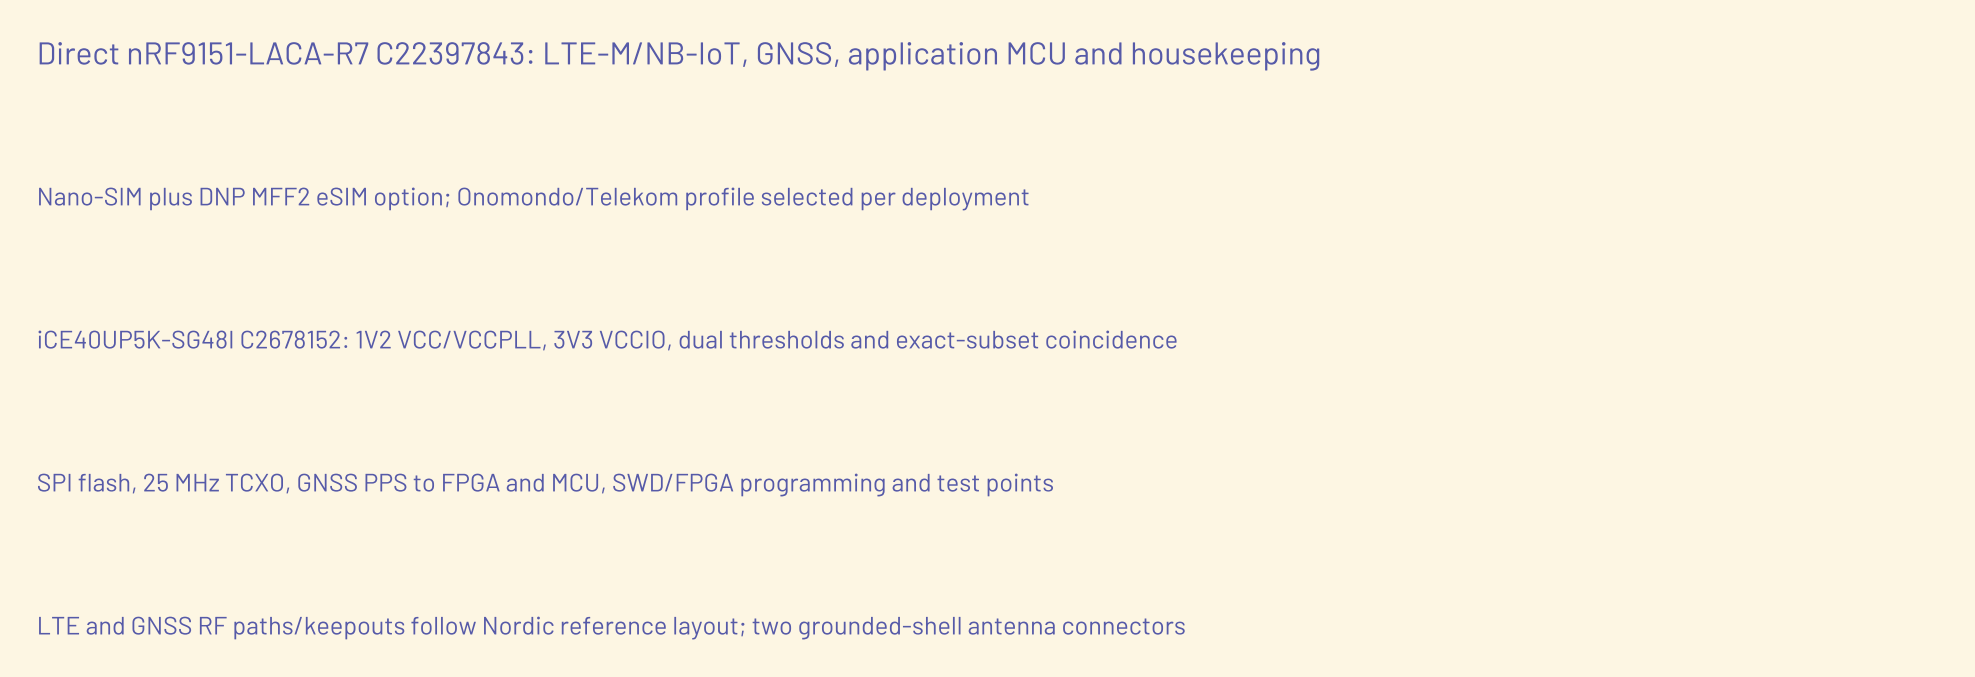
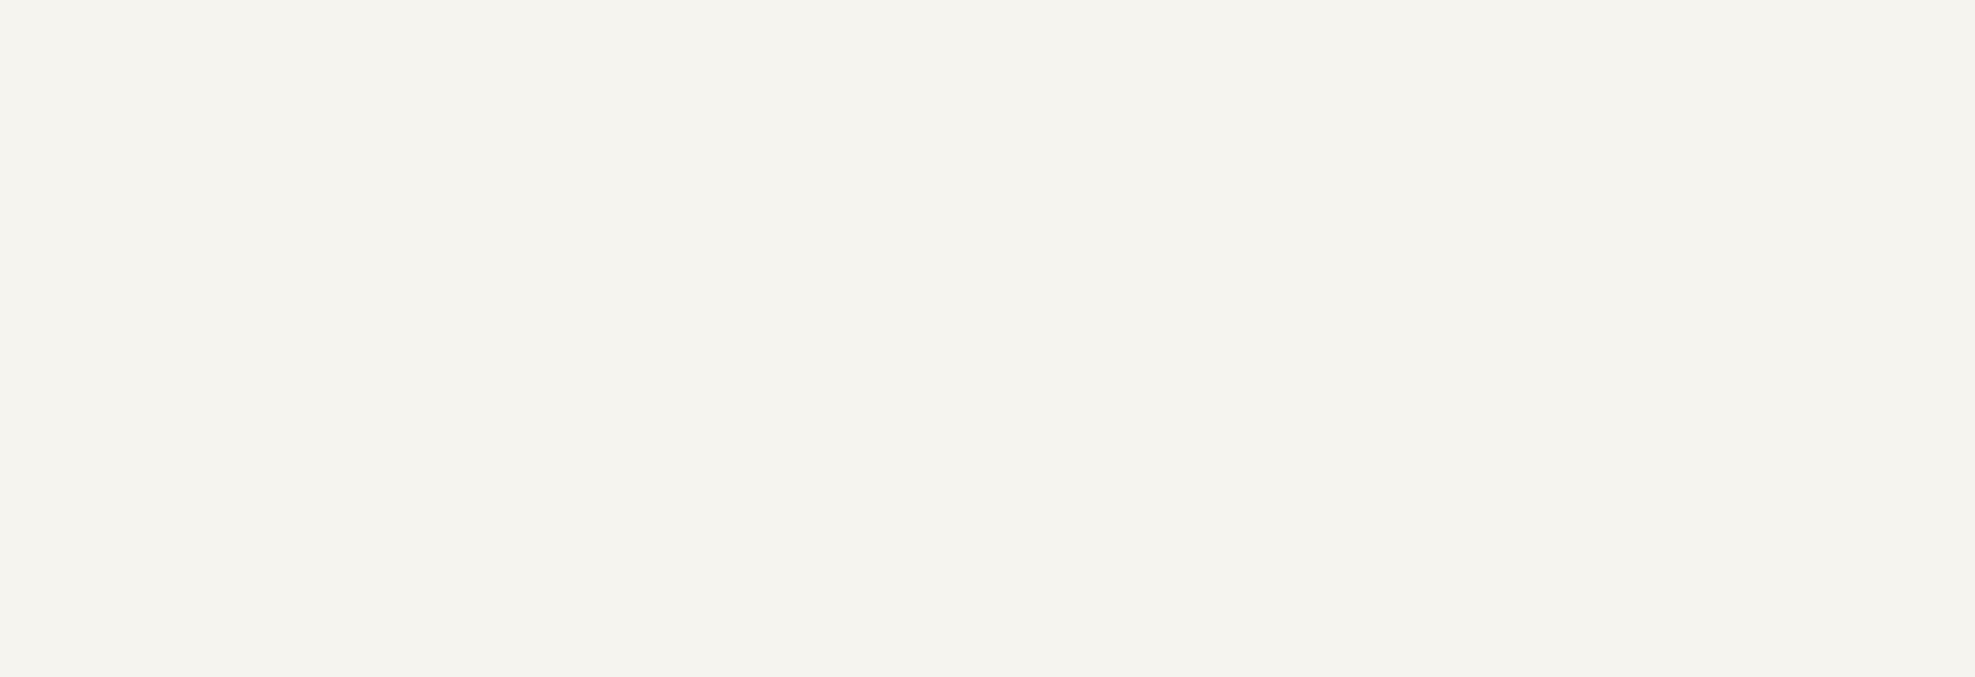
text: Direct nRF9151-LACA-R7 C22397843: LTE-M/NB-IoT, GNSS, application MCU and housekeeping (679, 56) -> none
text: Nano-SIM plus DNP MFF2 eSIM option; Onomondo/Telekom profile selected per deployment (533, 198) -> none
text: iCE40UP5K-SG48I C2678152: 1V2 VCC/VCCPLL, 3V3 VCCIO, dual thresholds and exact-subset coincidence (607, 340) -> none
text: SPI flash, 25 MHz TCXO, GNSS PPS to FPGA and MCU, SWD/FPGA programming and test points (545, 485) -> none
text: LTE and GNSS RF paths/keepouts follow Nordic reference layout; two grounded-shell antenna connectors (611, 628) -> none

